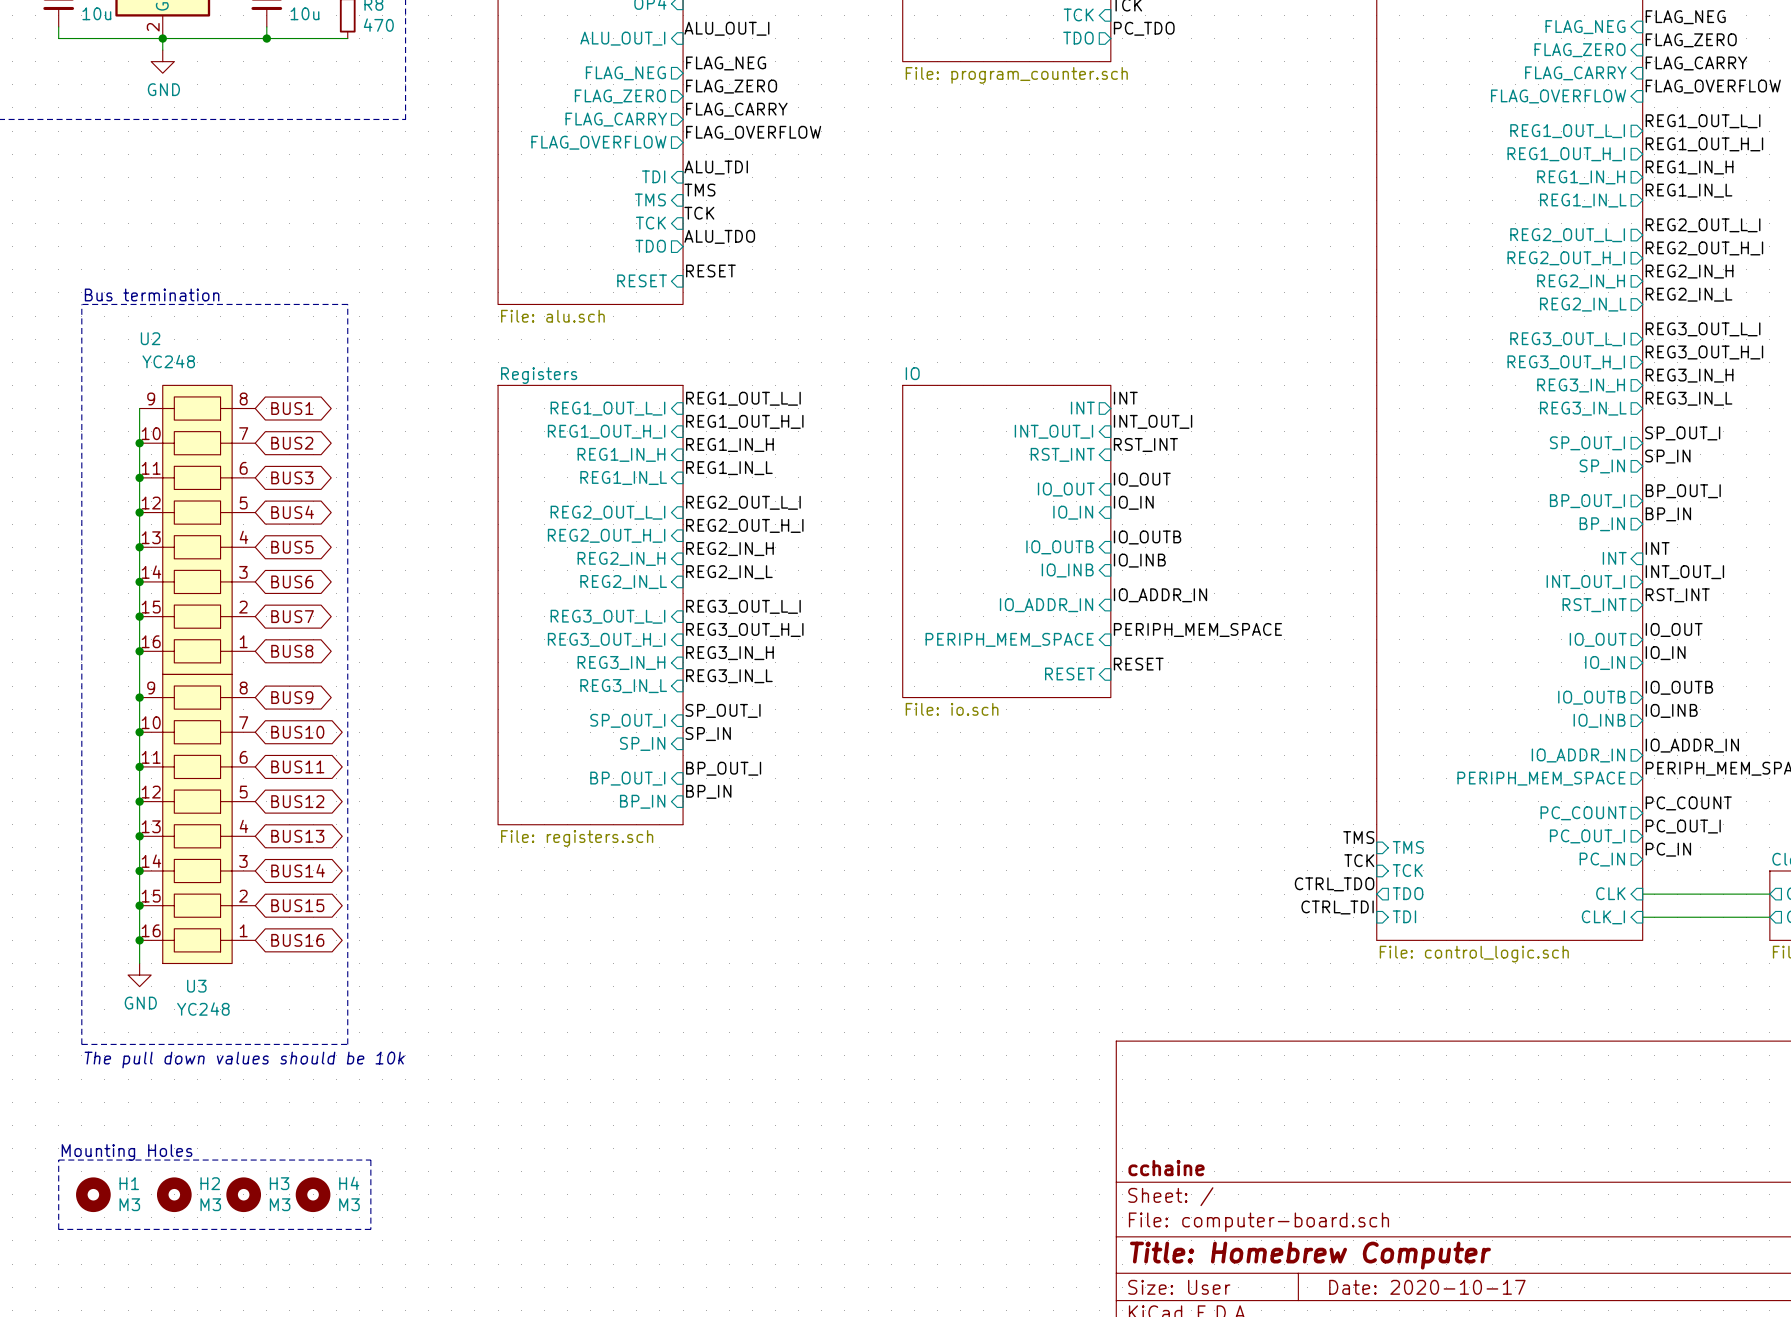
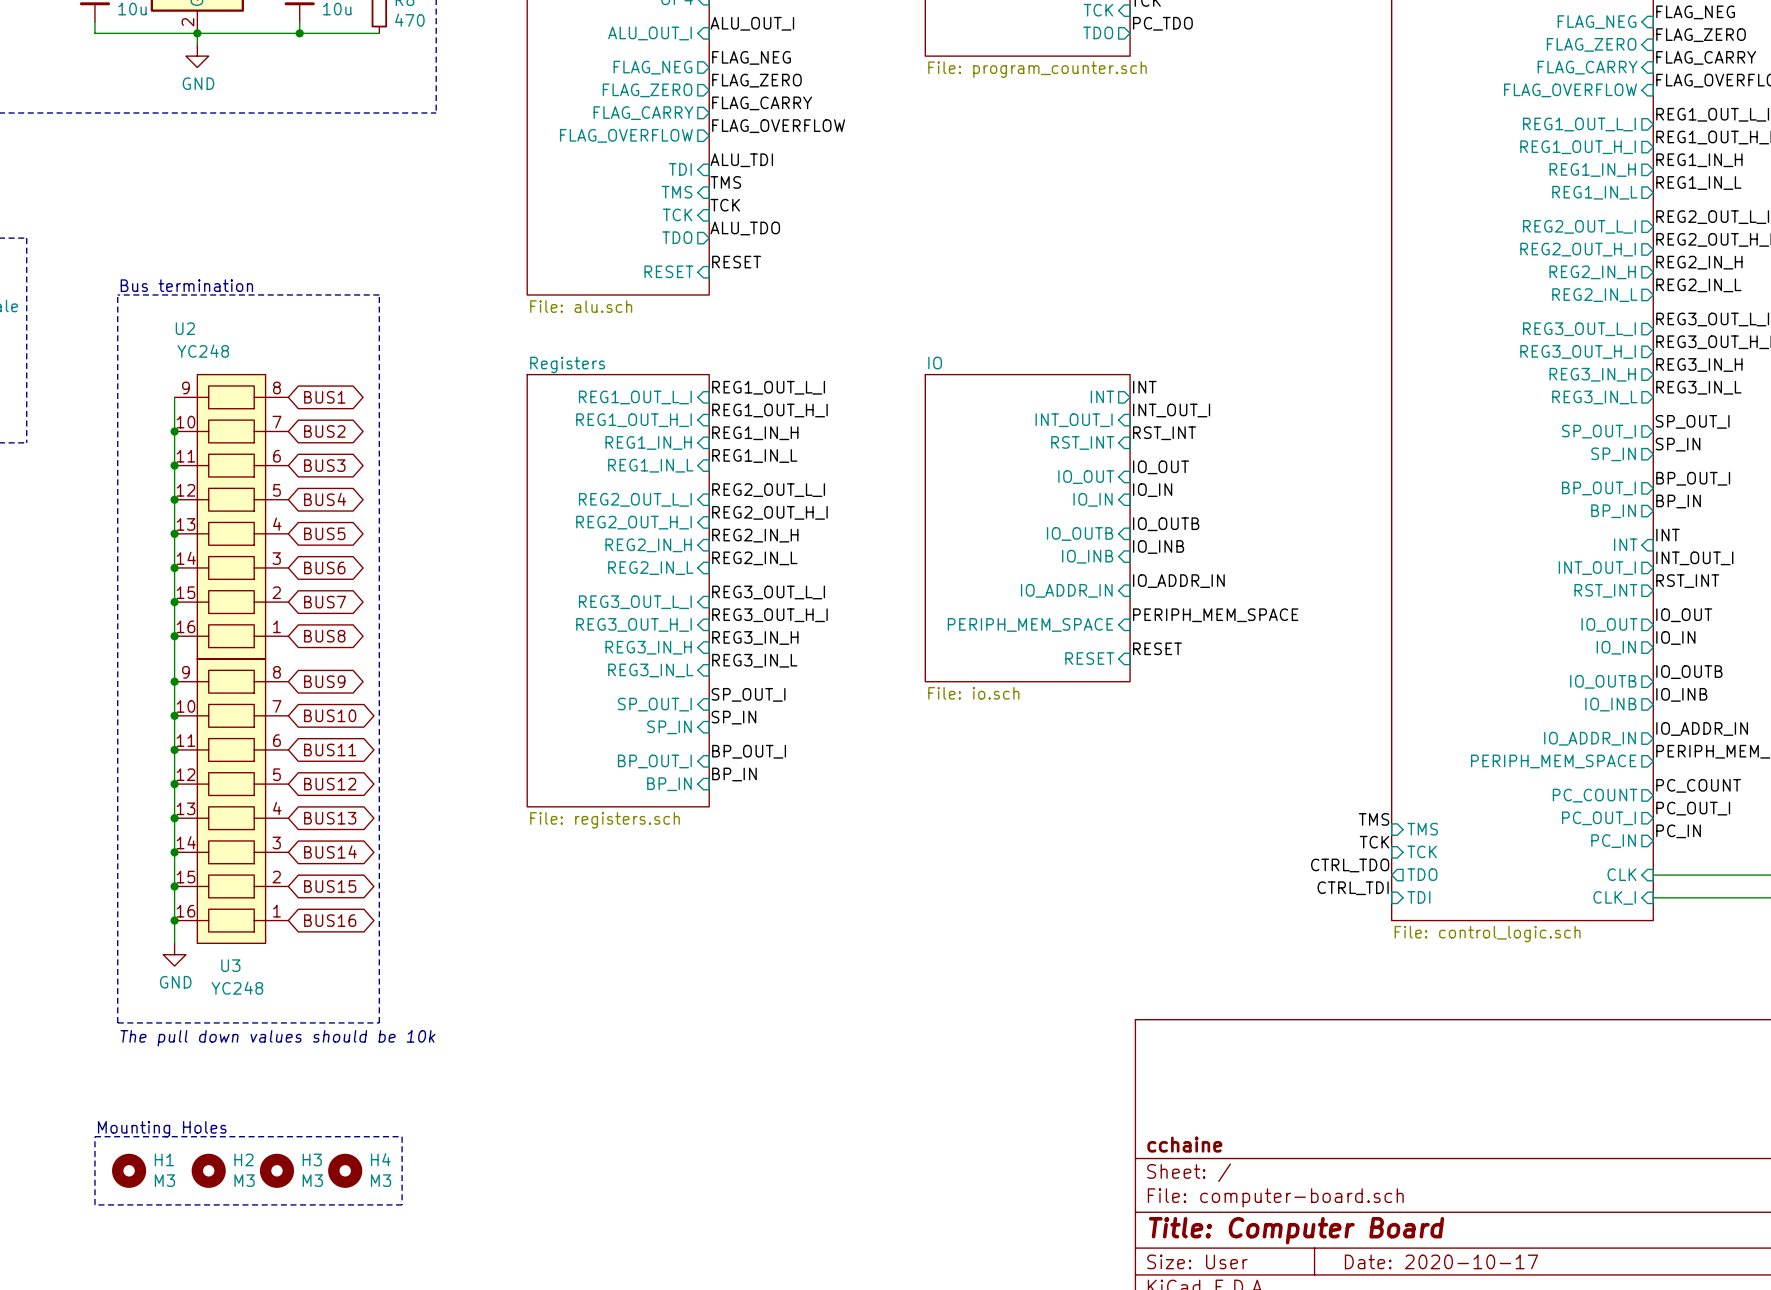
title block: Title: Homebrew Computer (1310, 1255) -> Title: Computer Board (1296, 1230)

